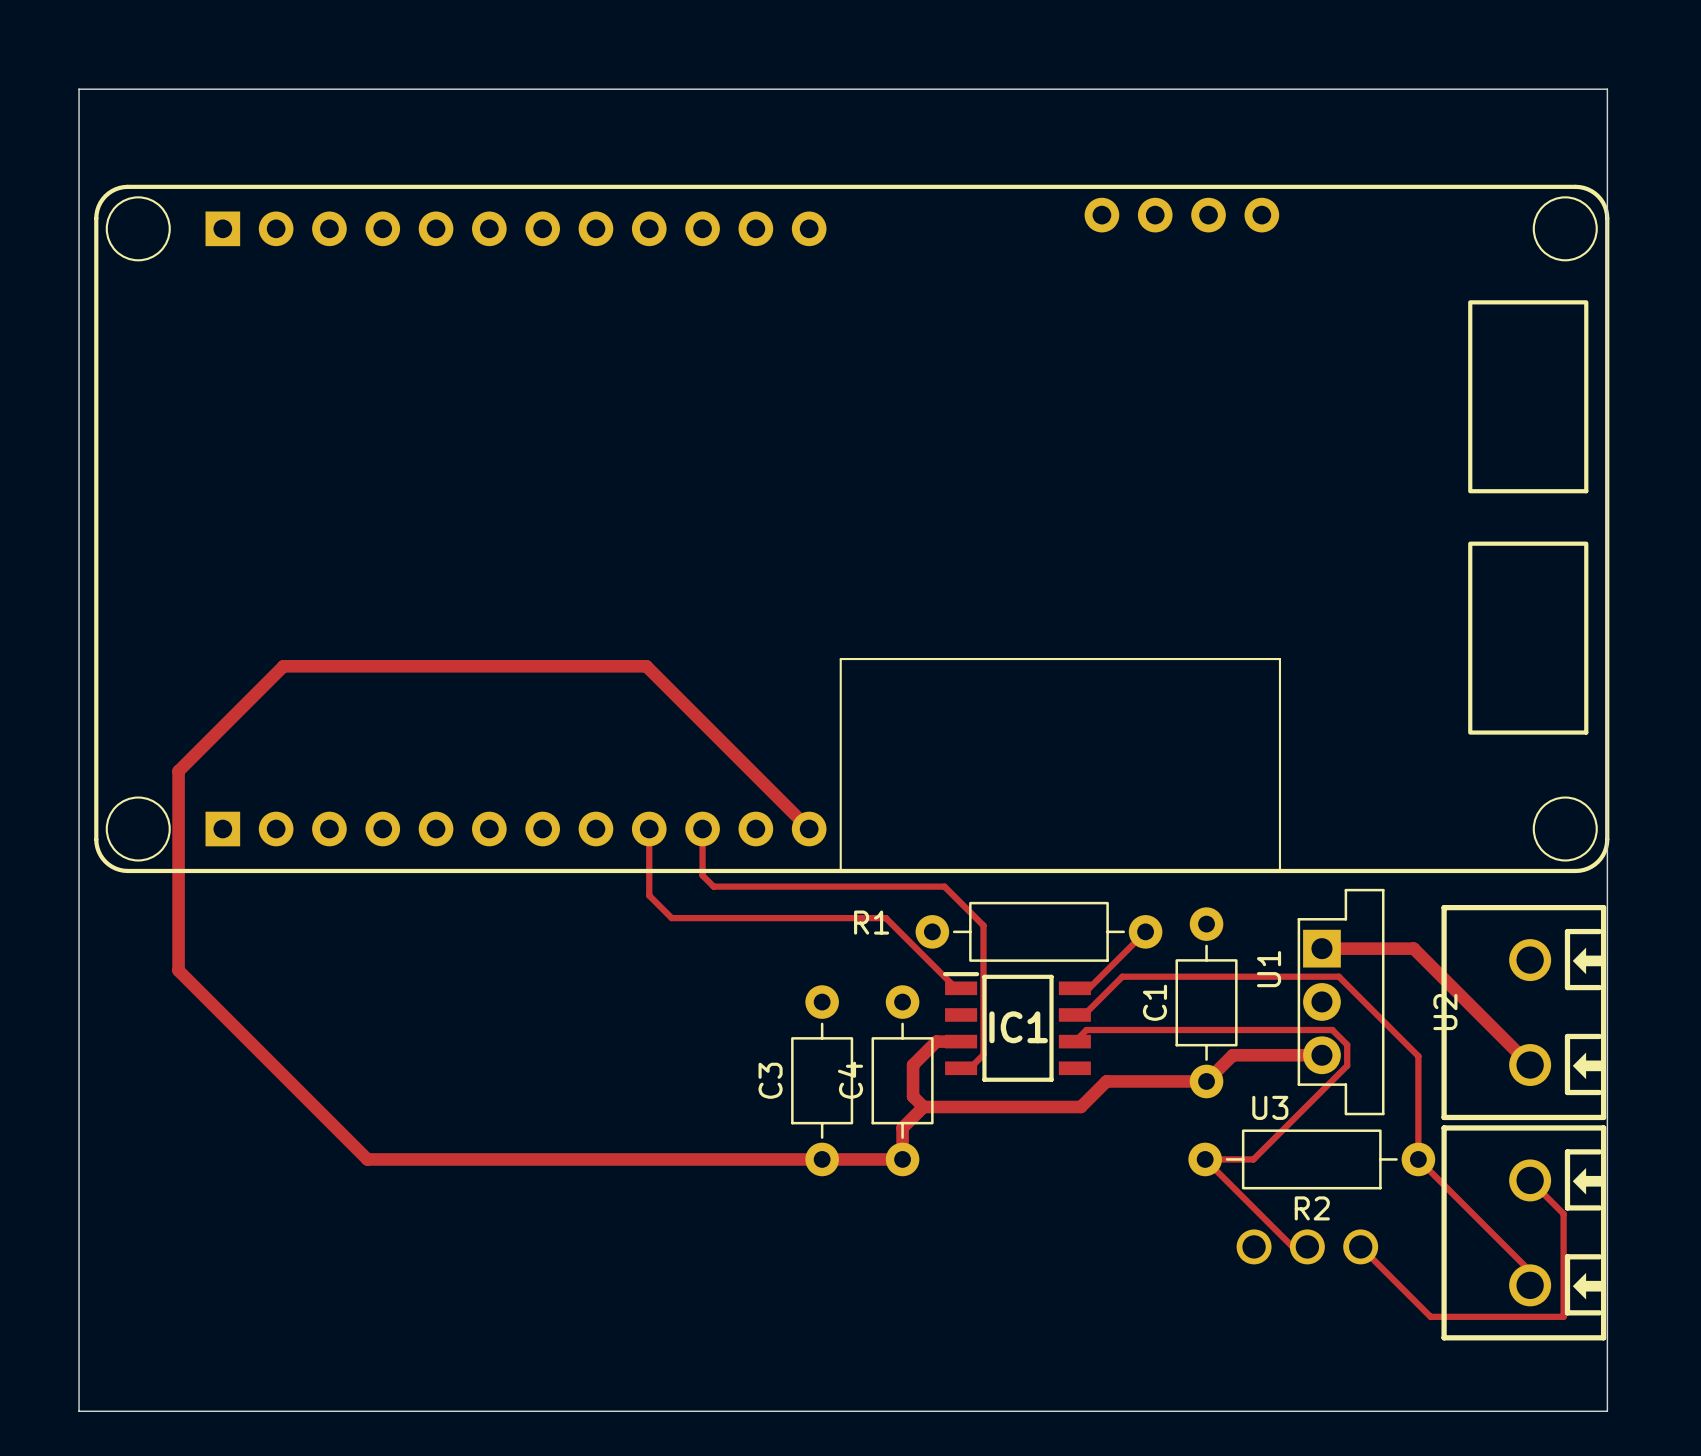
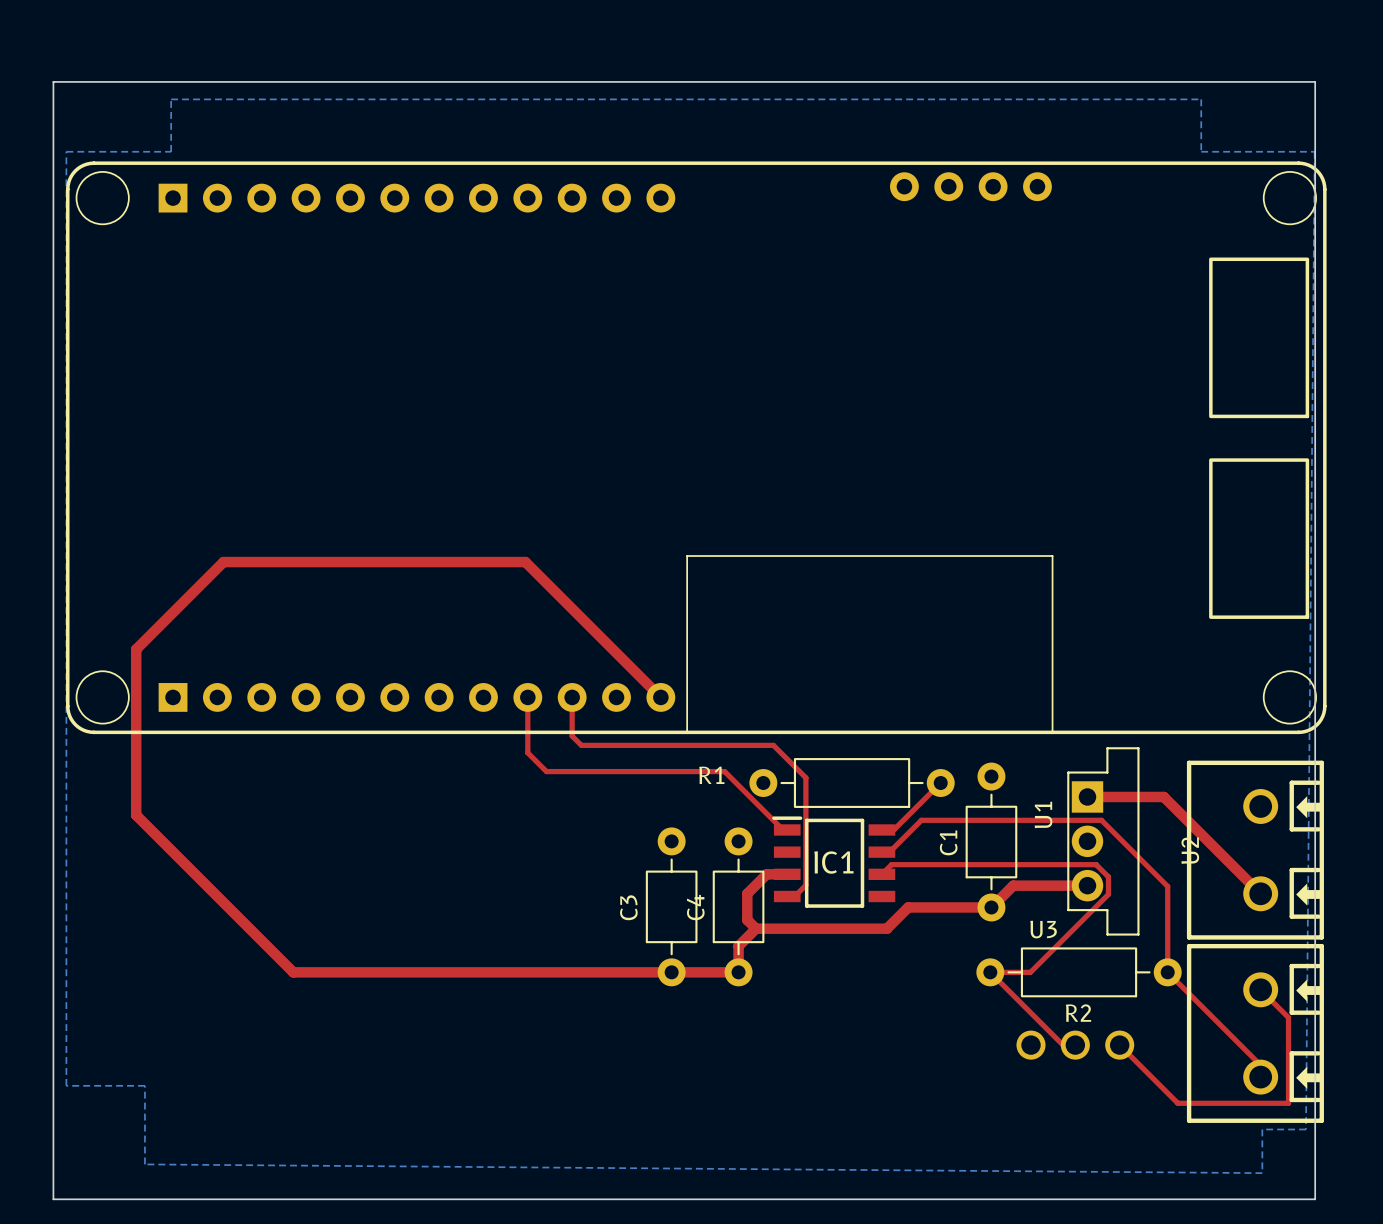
board edge: (1595, 89) (1607, 89) (1607, 1411) (79, 1411) -> (1315, 81) (1315, 1199) (53, 1199) (53, 1181)
bottom zone outline: none -> (171, 99) (171, 151) (66, 151) (66, 1085) (144, 1085) (144, 1164) (1262, 1173) (1262, 1129) (1305, 1129) (1314, 151) (1201, 151) (1201, 99) (171, 99)

